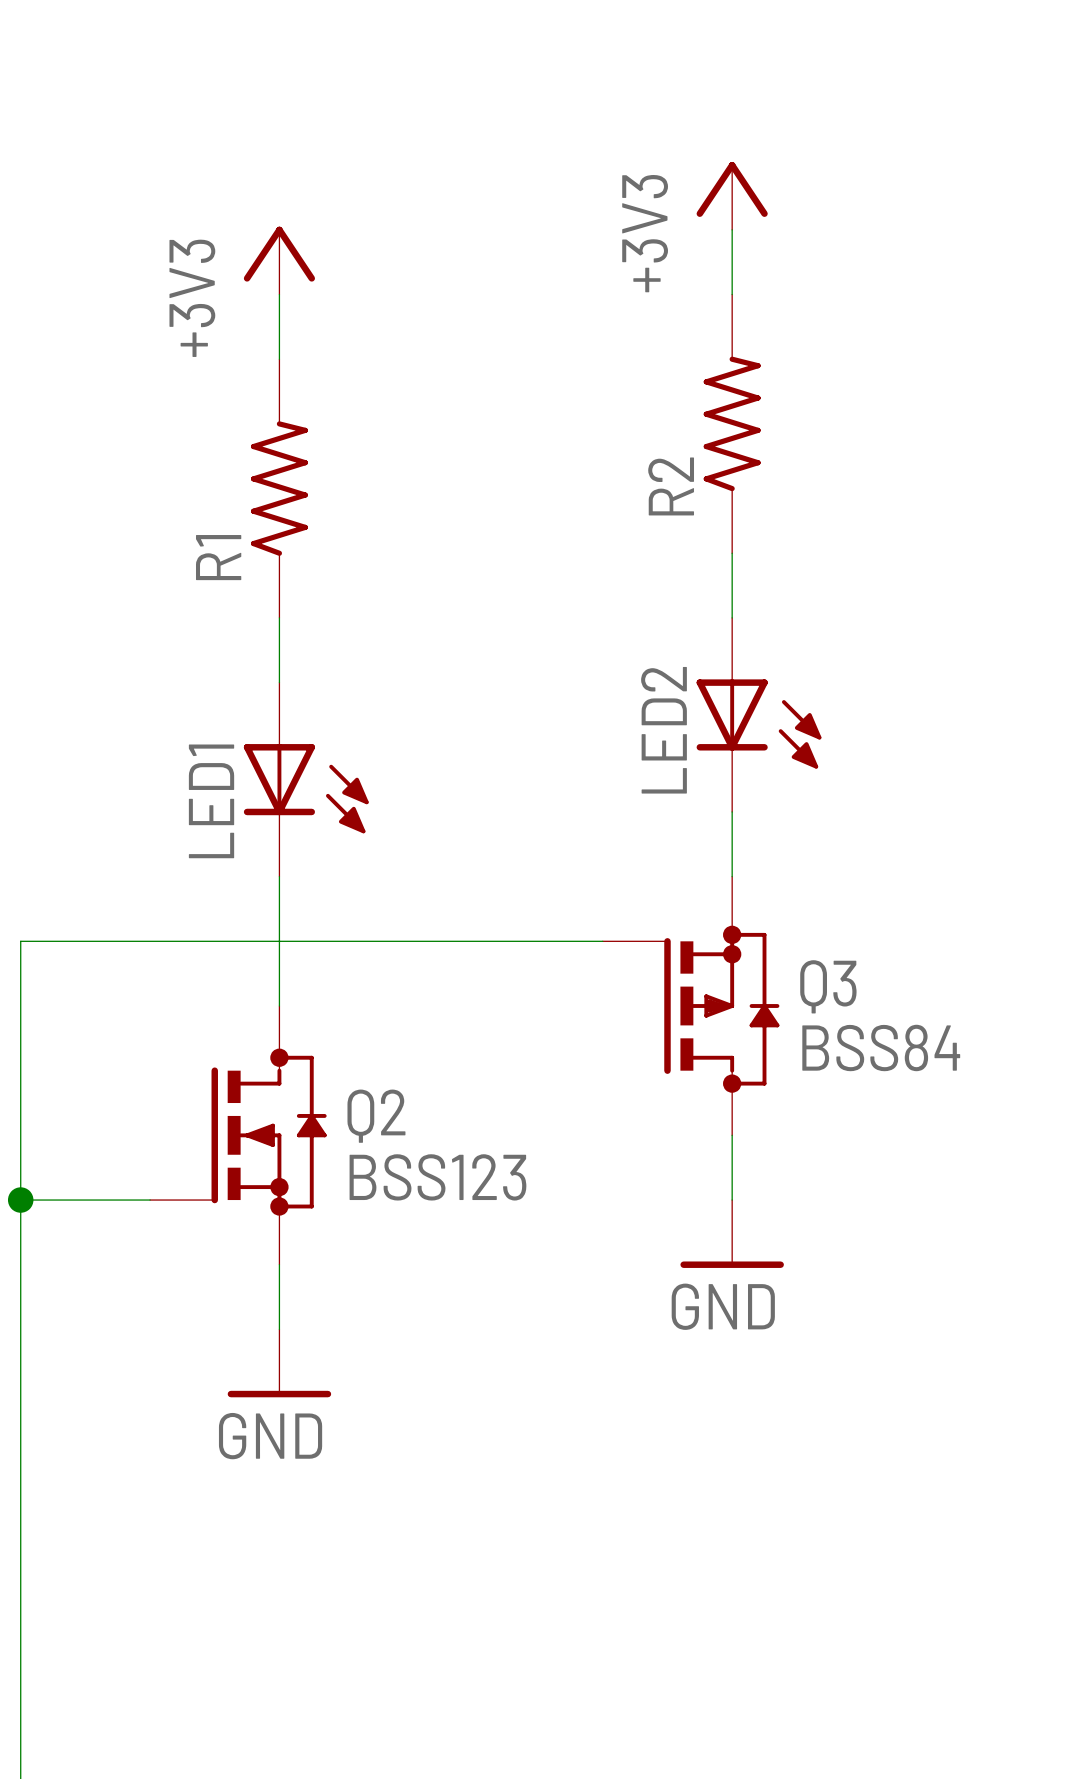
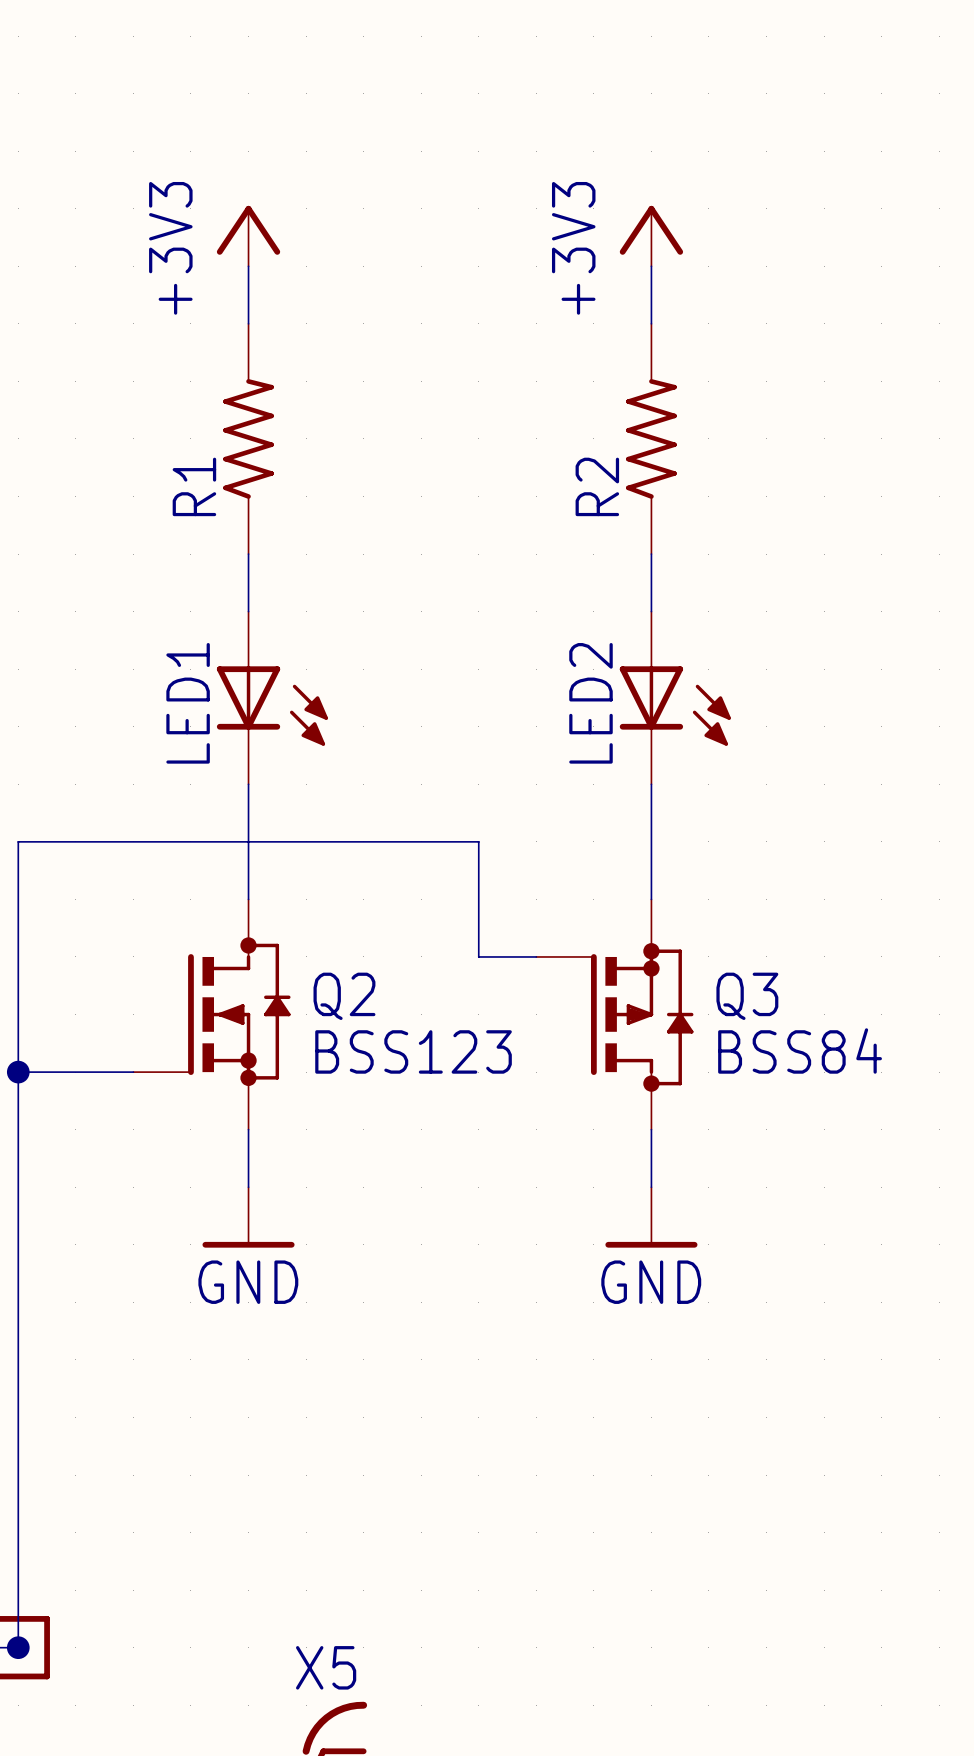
power symbol position: +3V3 (732, 195) -> +3V3 (651, 236)
R2 position: (732, 423) -> (651, 438)
LED2 position: (759, 714) -> (675, 697)
wire: (538, 941) (602, 941) -> (478, 841) (478, 956) (536, 956)
Q3 position: (691, 1006) -> (614, 1014)
wire: (732, 1135) (732, 1200) -> (651, 1129) (651, 1187)
power symbol position: GND (732, 1233) -> GND (651, 1217)

